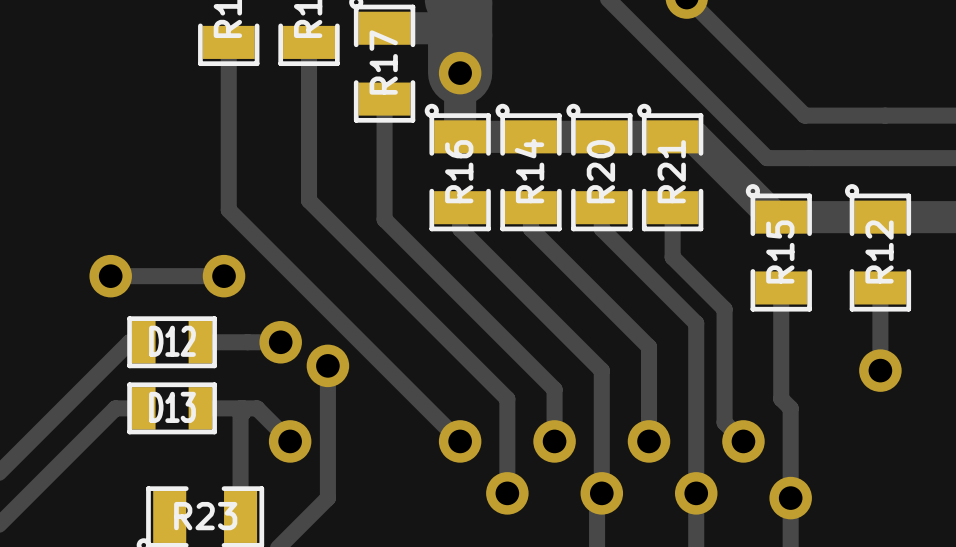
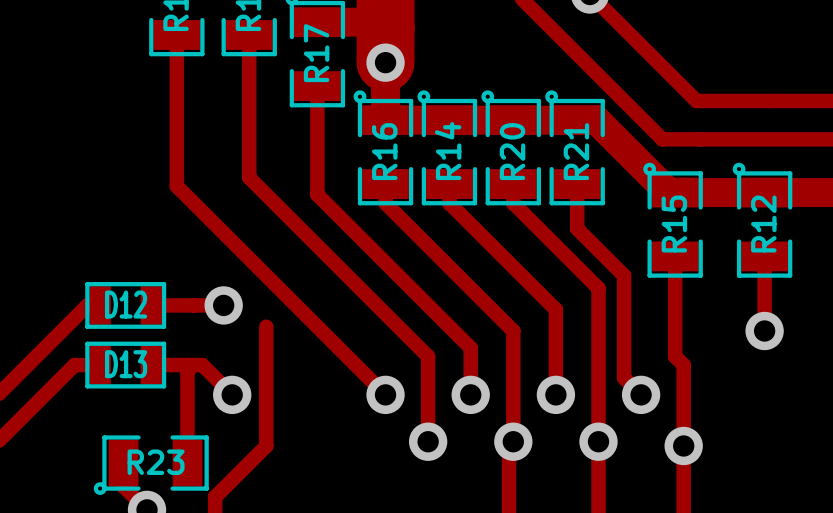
track: (110, 276) (224, 276) -> none
via: (110, 276) -> none
via: (224, 276) -> none
via: (327, 365) -> none

